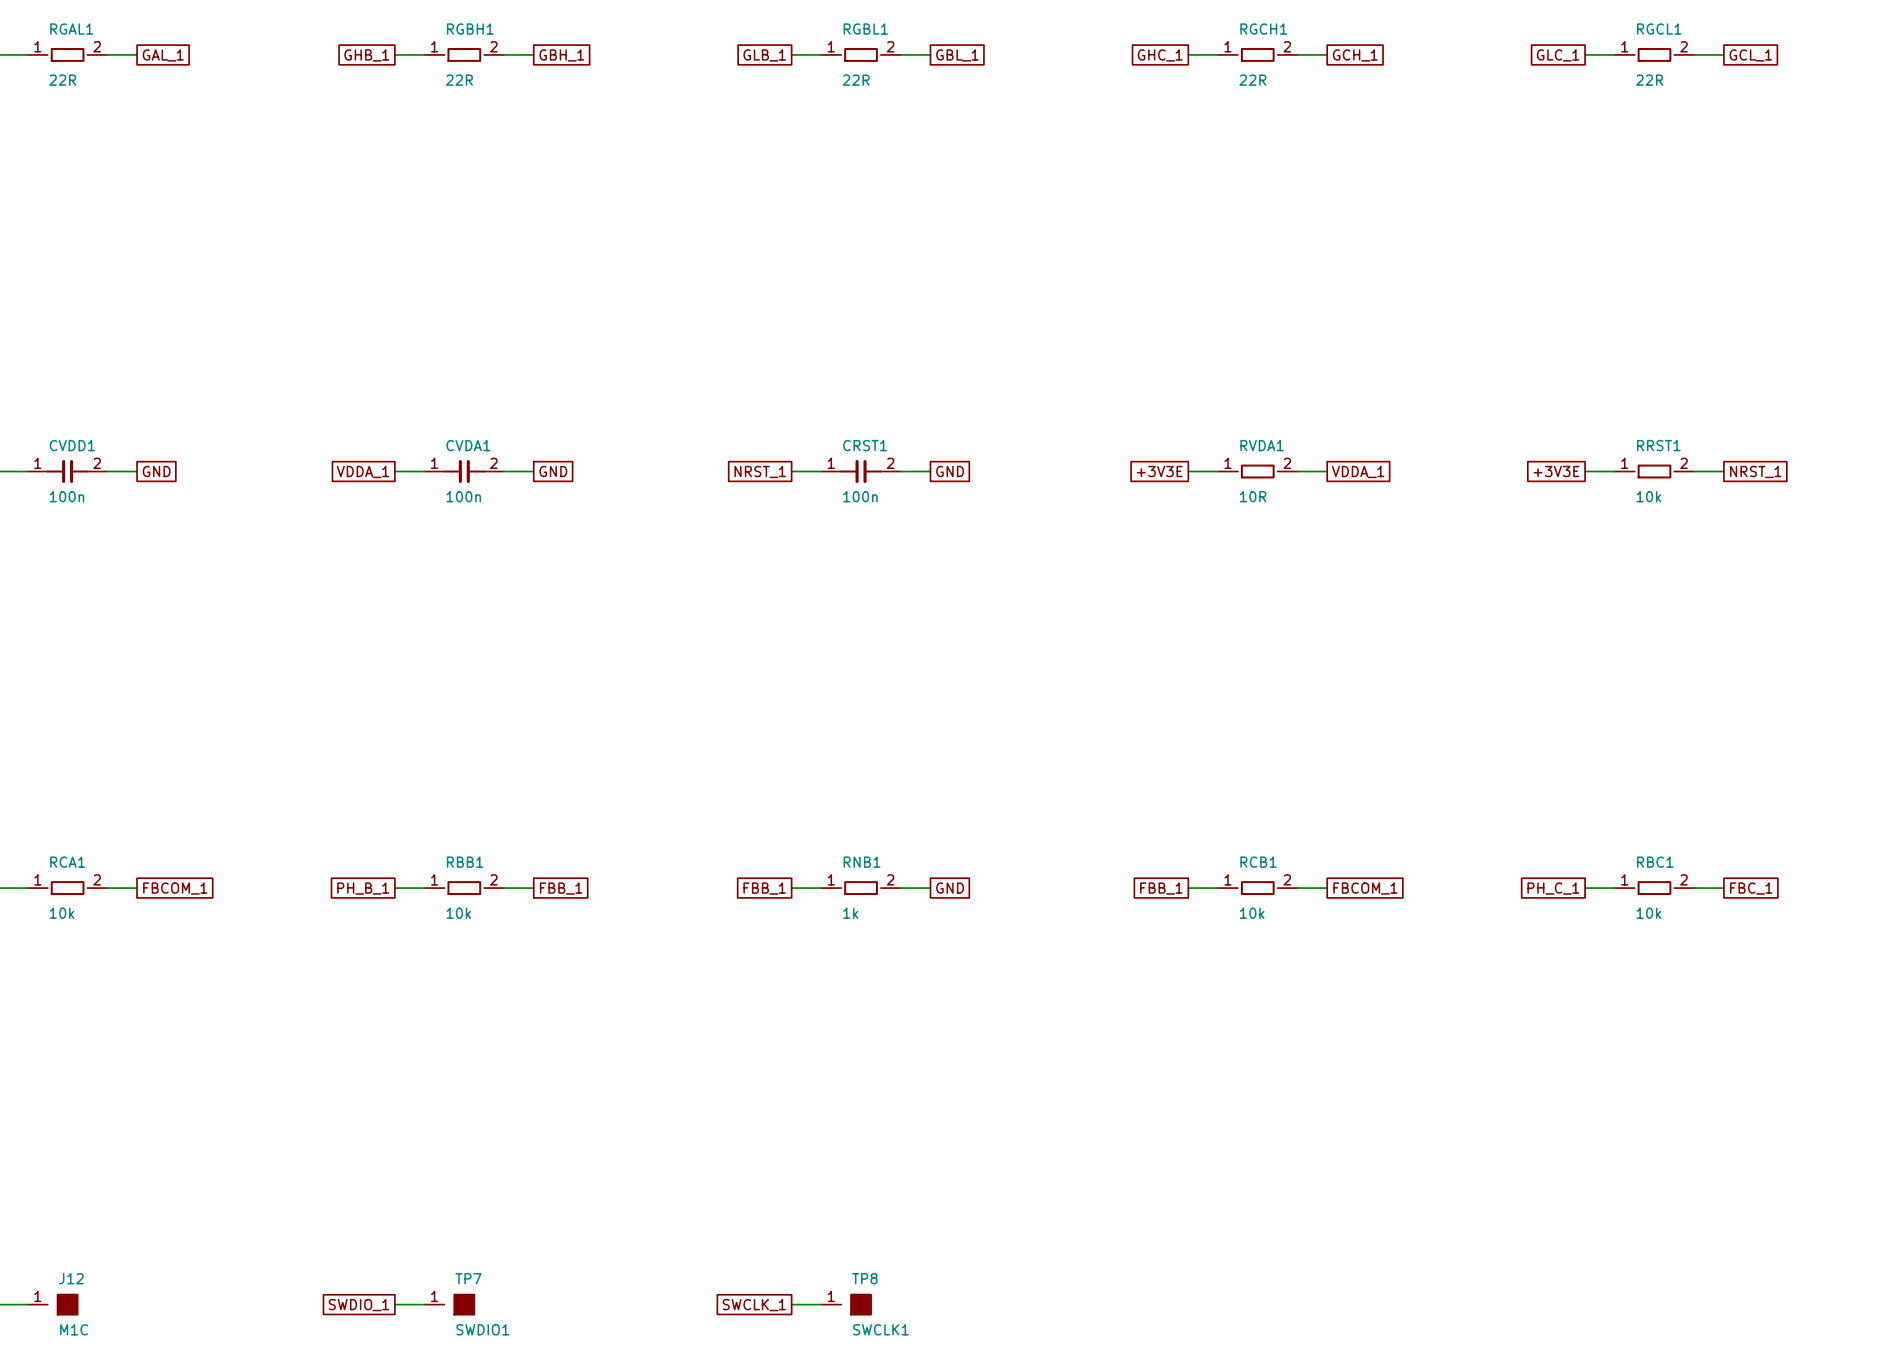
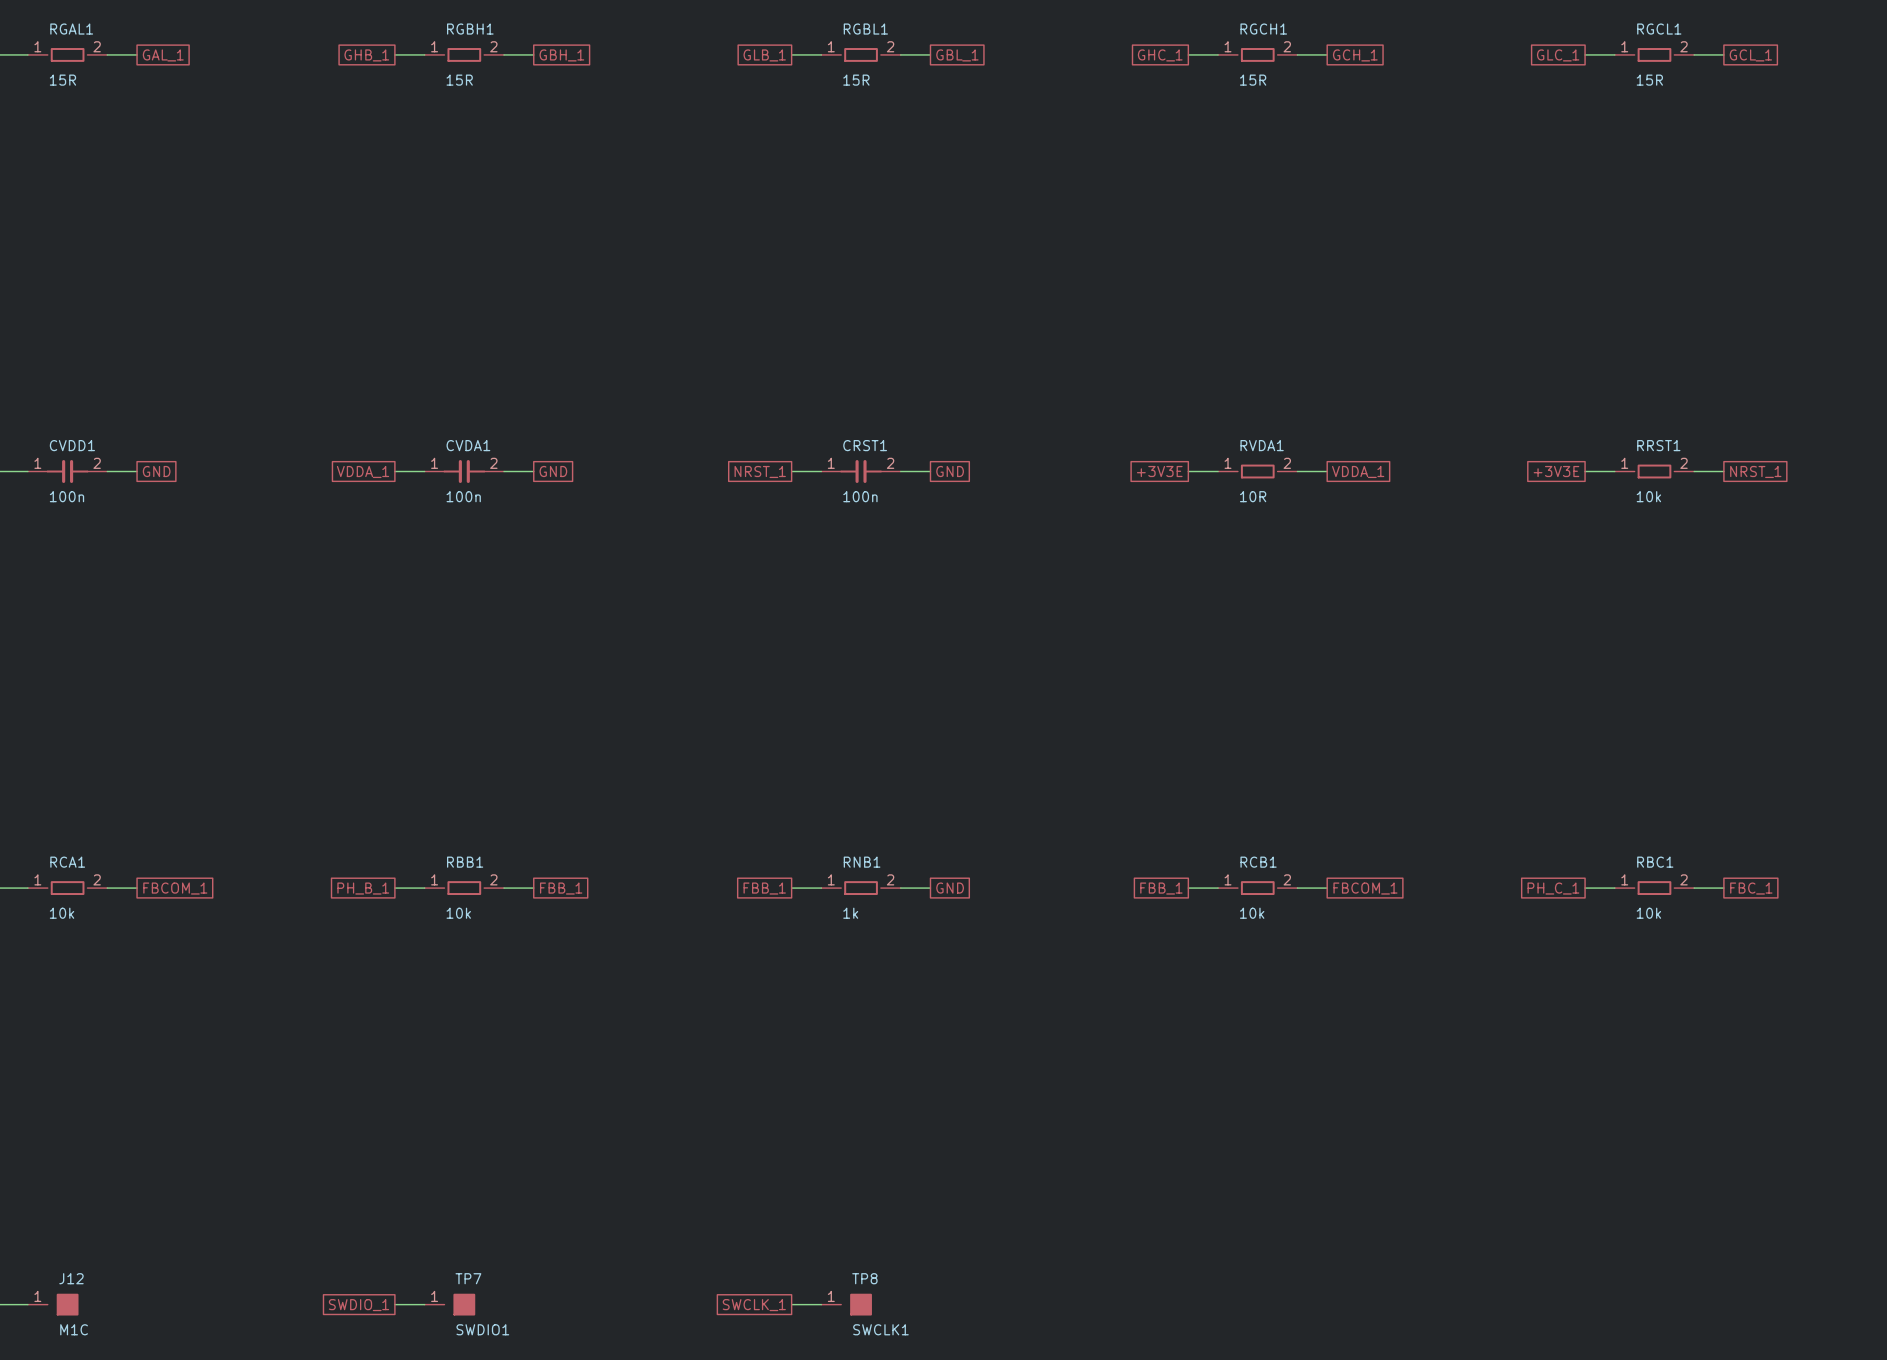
RGAL1 value: 22R (62, 80) -> 15R (62, 80)
RGBH1 value: 22R (459, 80) -> 15R (459, 80)
RGBL1 value: 22R (856, 80) -> 15R (856, 80)
RGCH1 value: 22R (1252, 80) -> 15R (1253, 80)
RGCL1 value: 22R (1649, 80) -> 15R (1649, 80)

